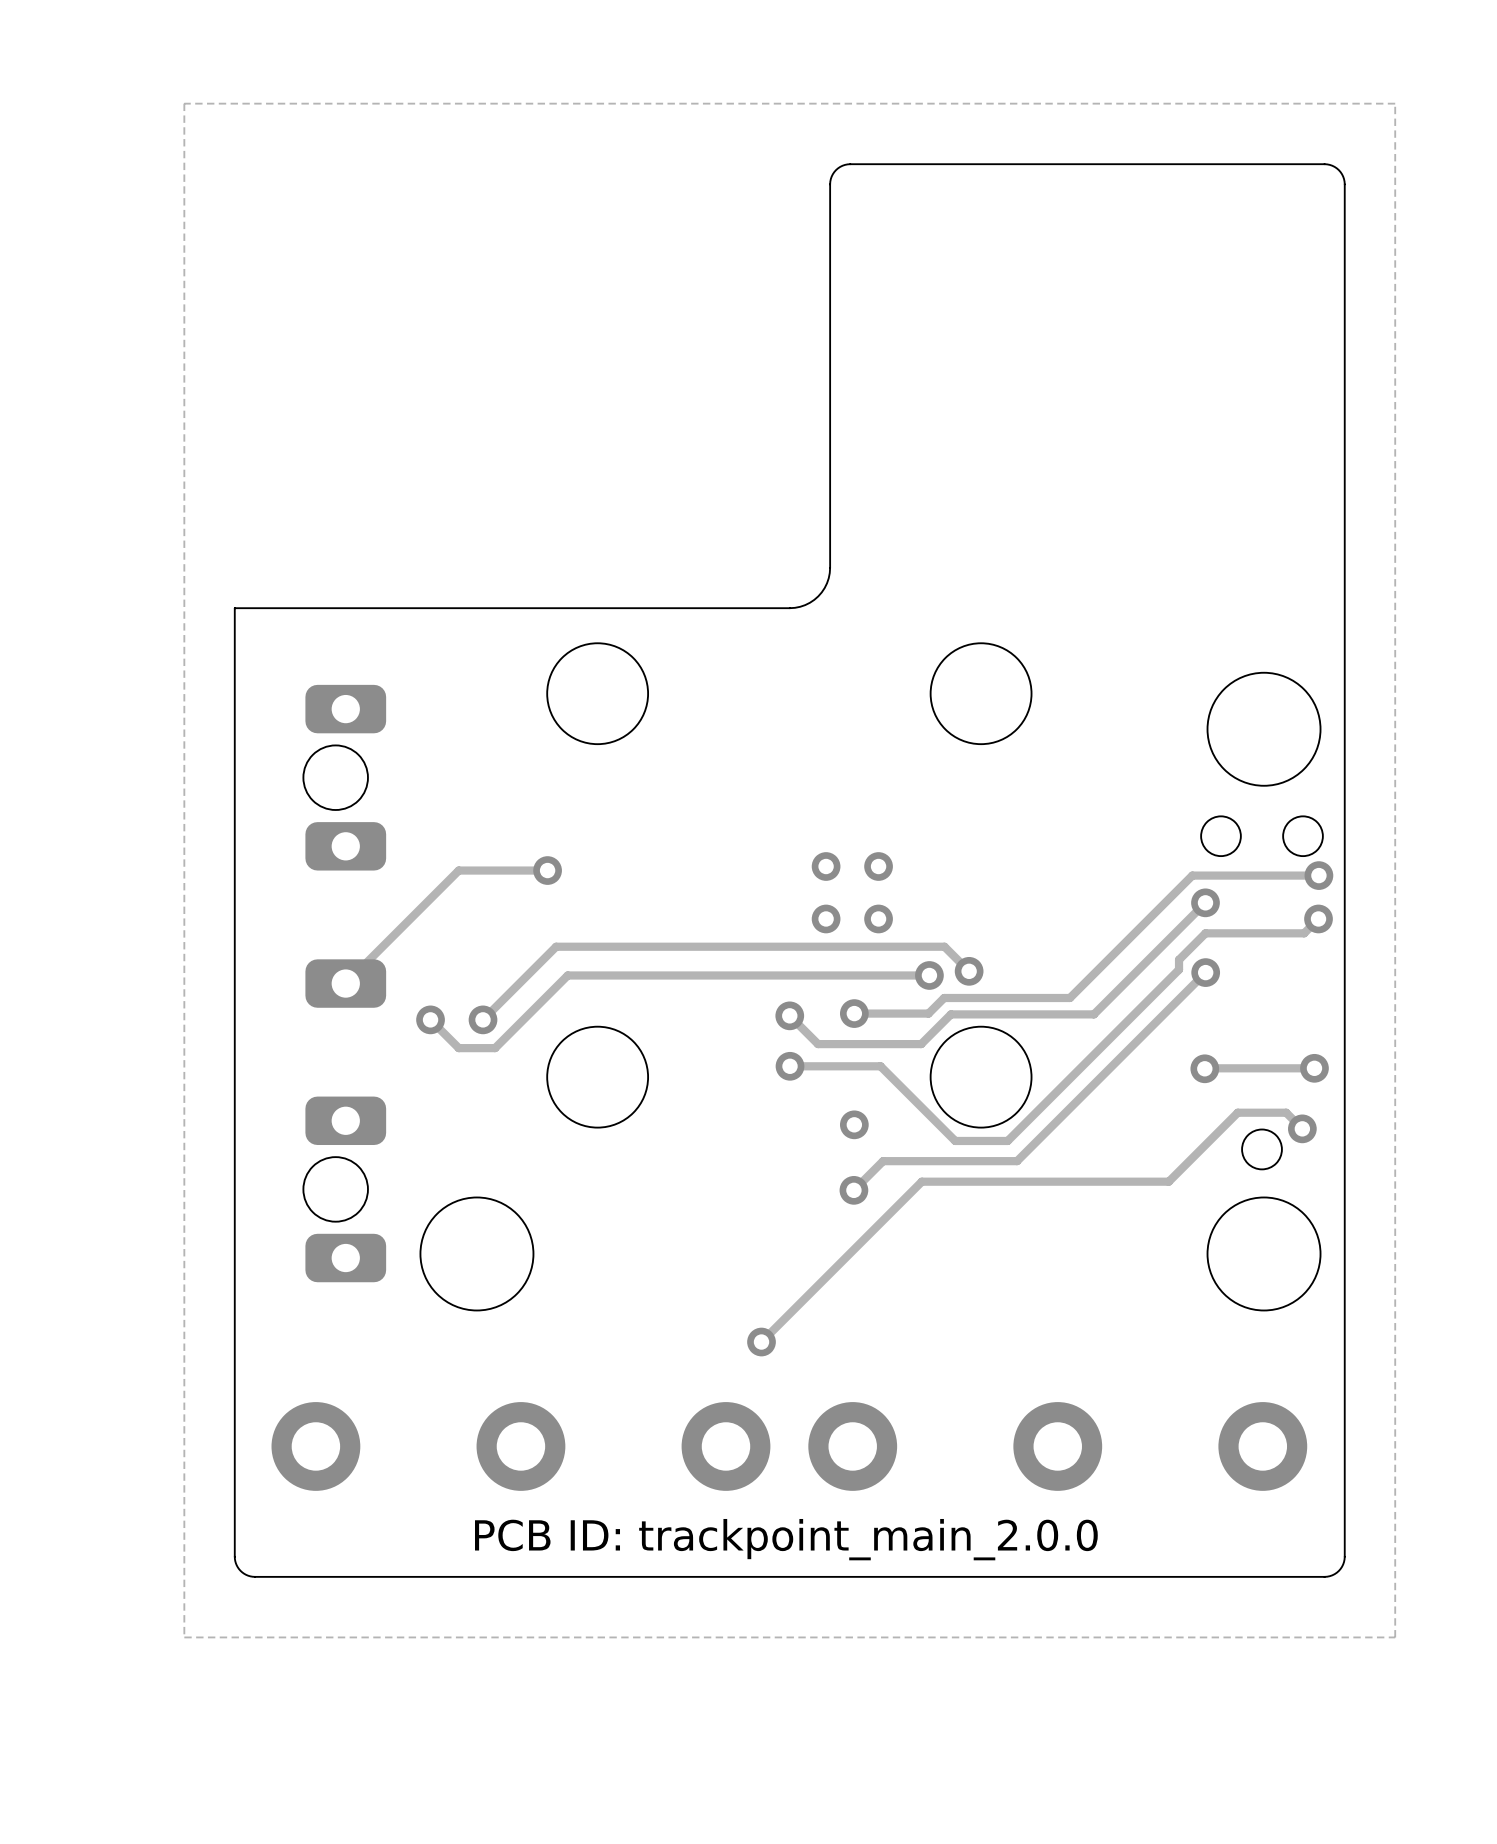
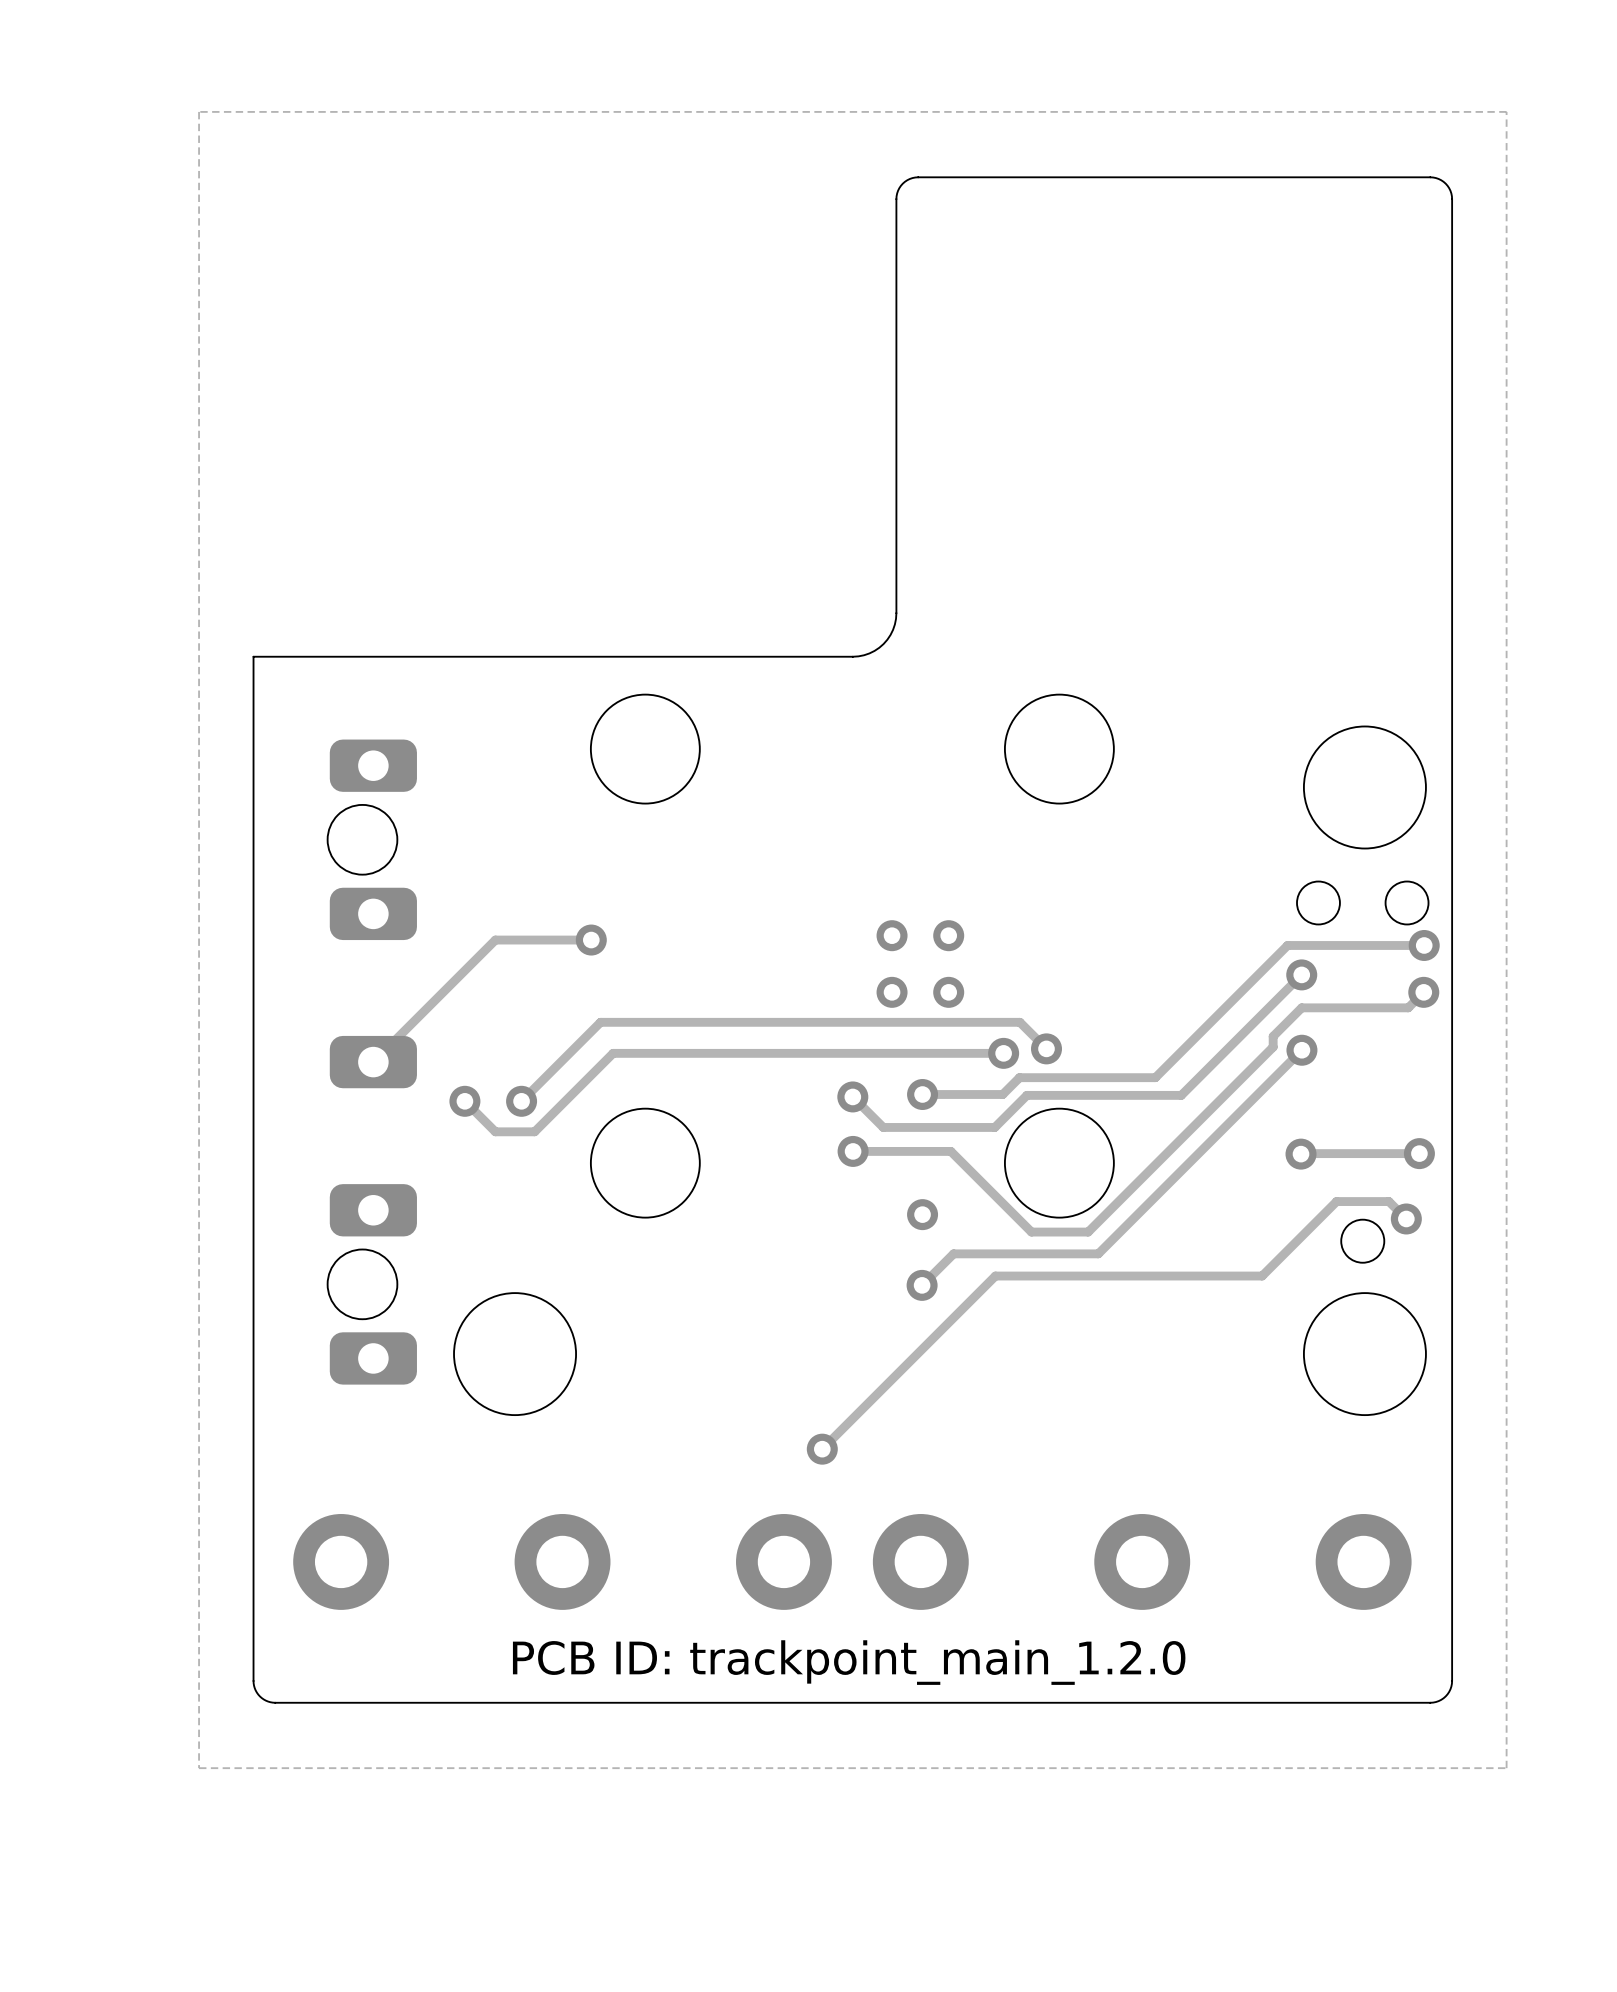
text: PCB ID: trackpoint_main_2.0.0 (786, 1539) -> PCB ID: trackpoint_main_1.2.0 (849, 1662)

